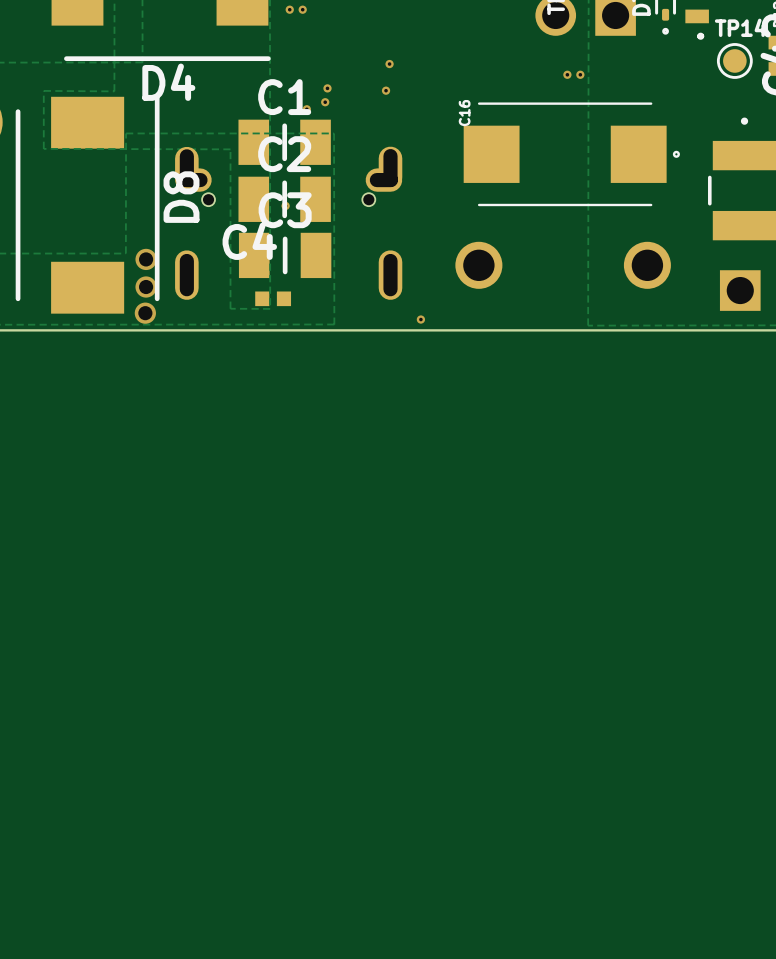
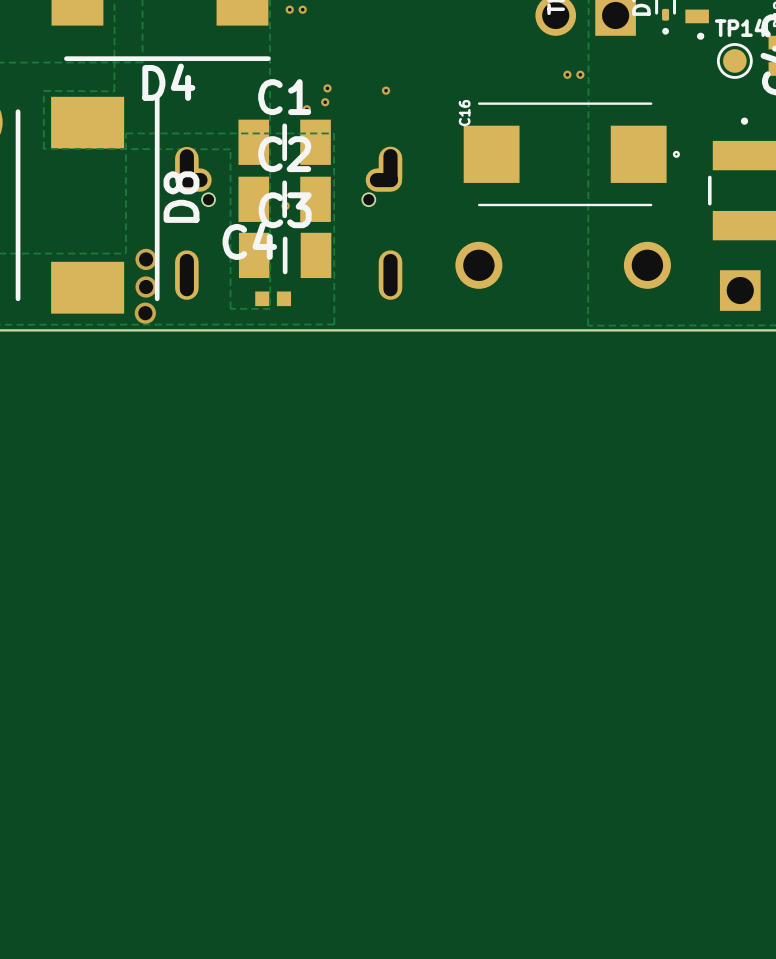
via: (389, 64) -> none
via: (420, 319) -> none

